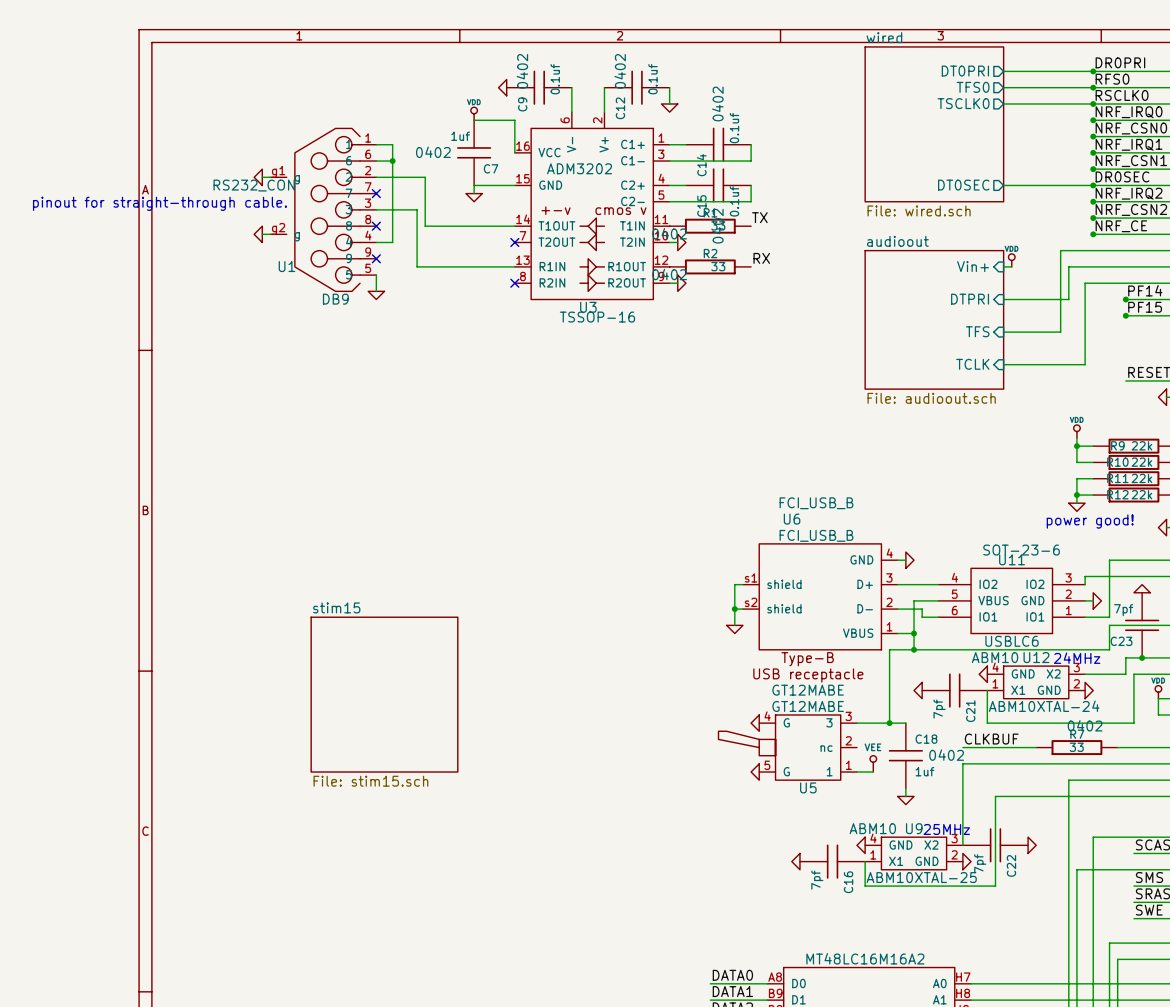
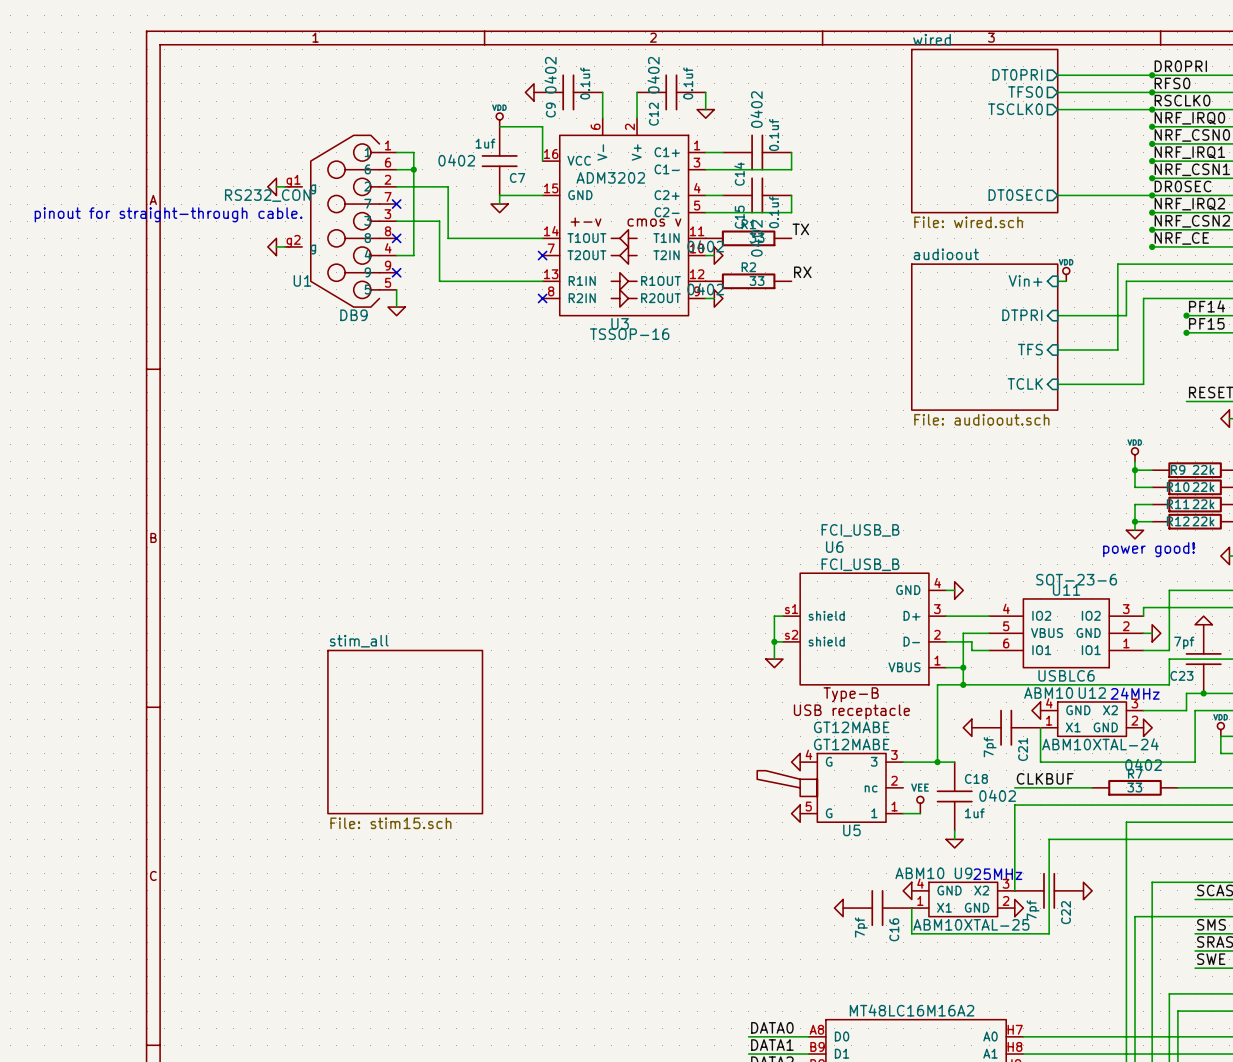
sheet stim15 name: stim15 (336, 607) -> stim_all (359, 641)

